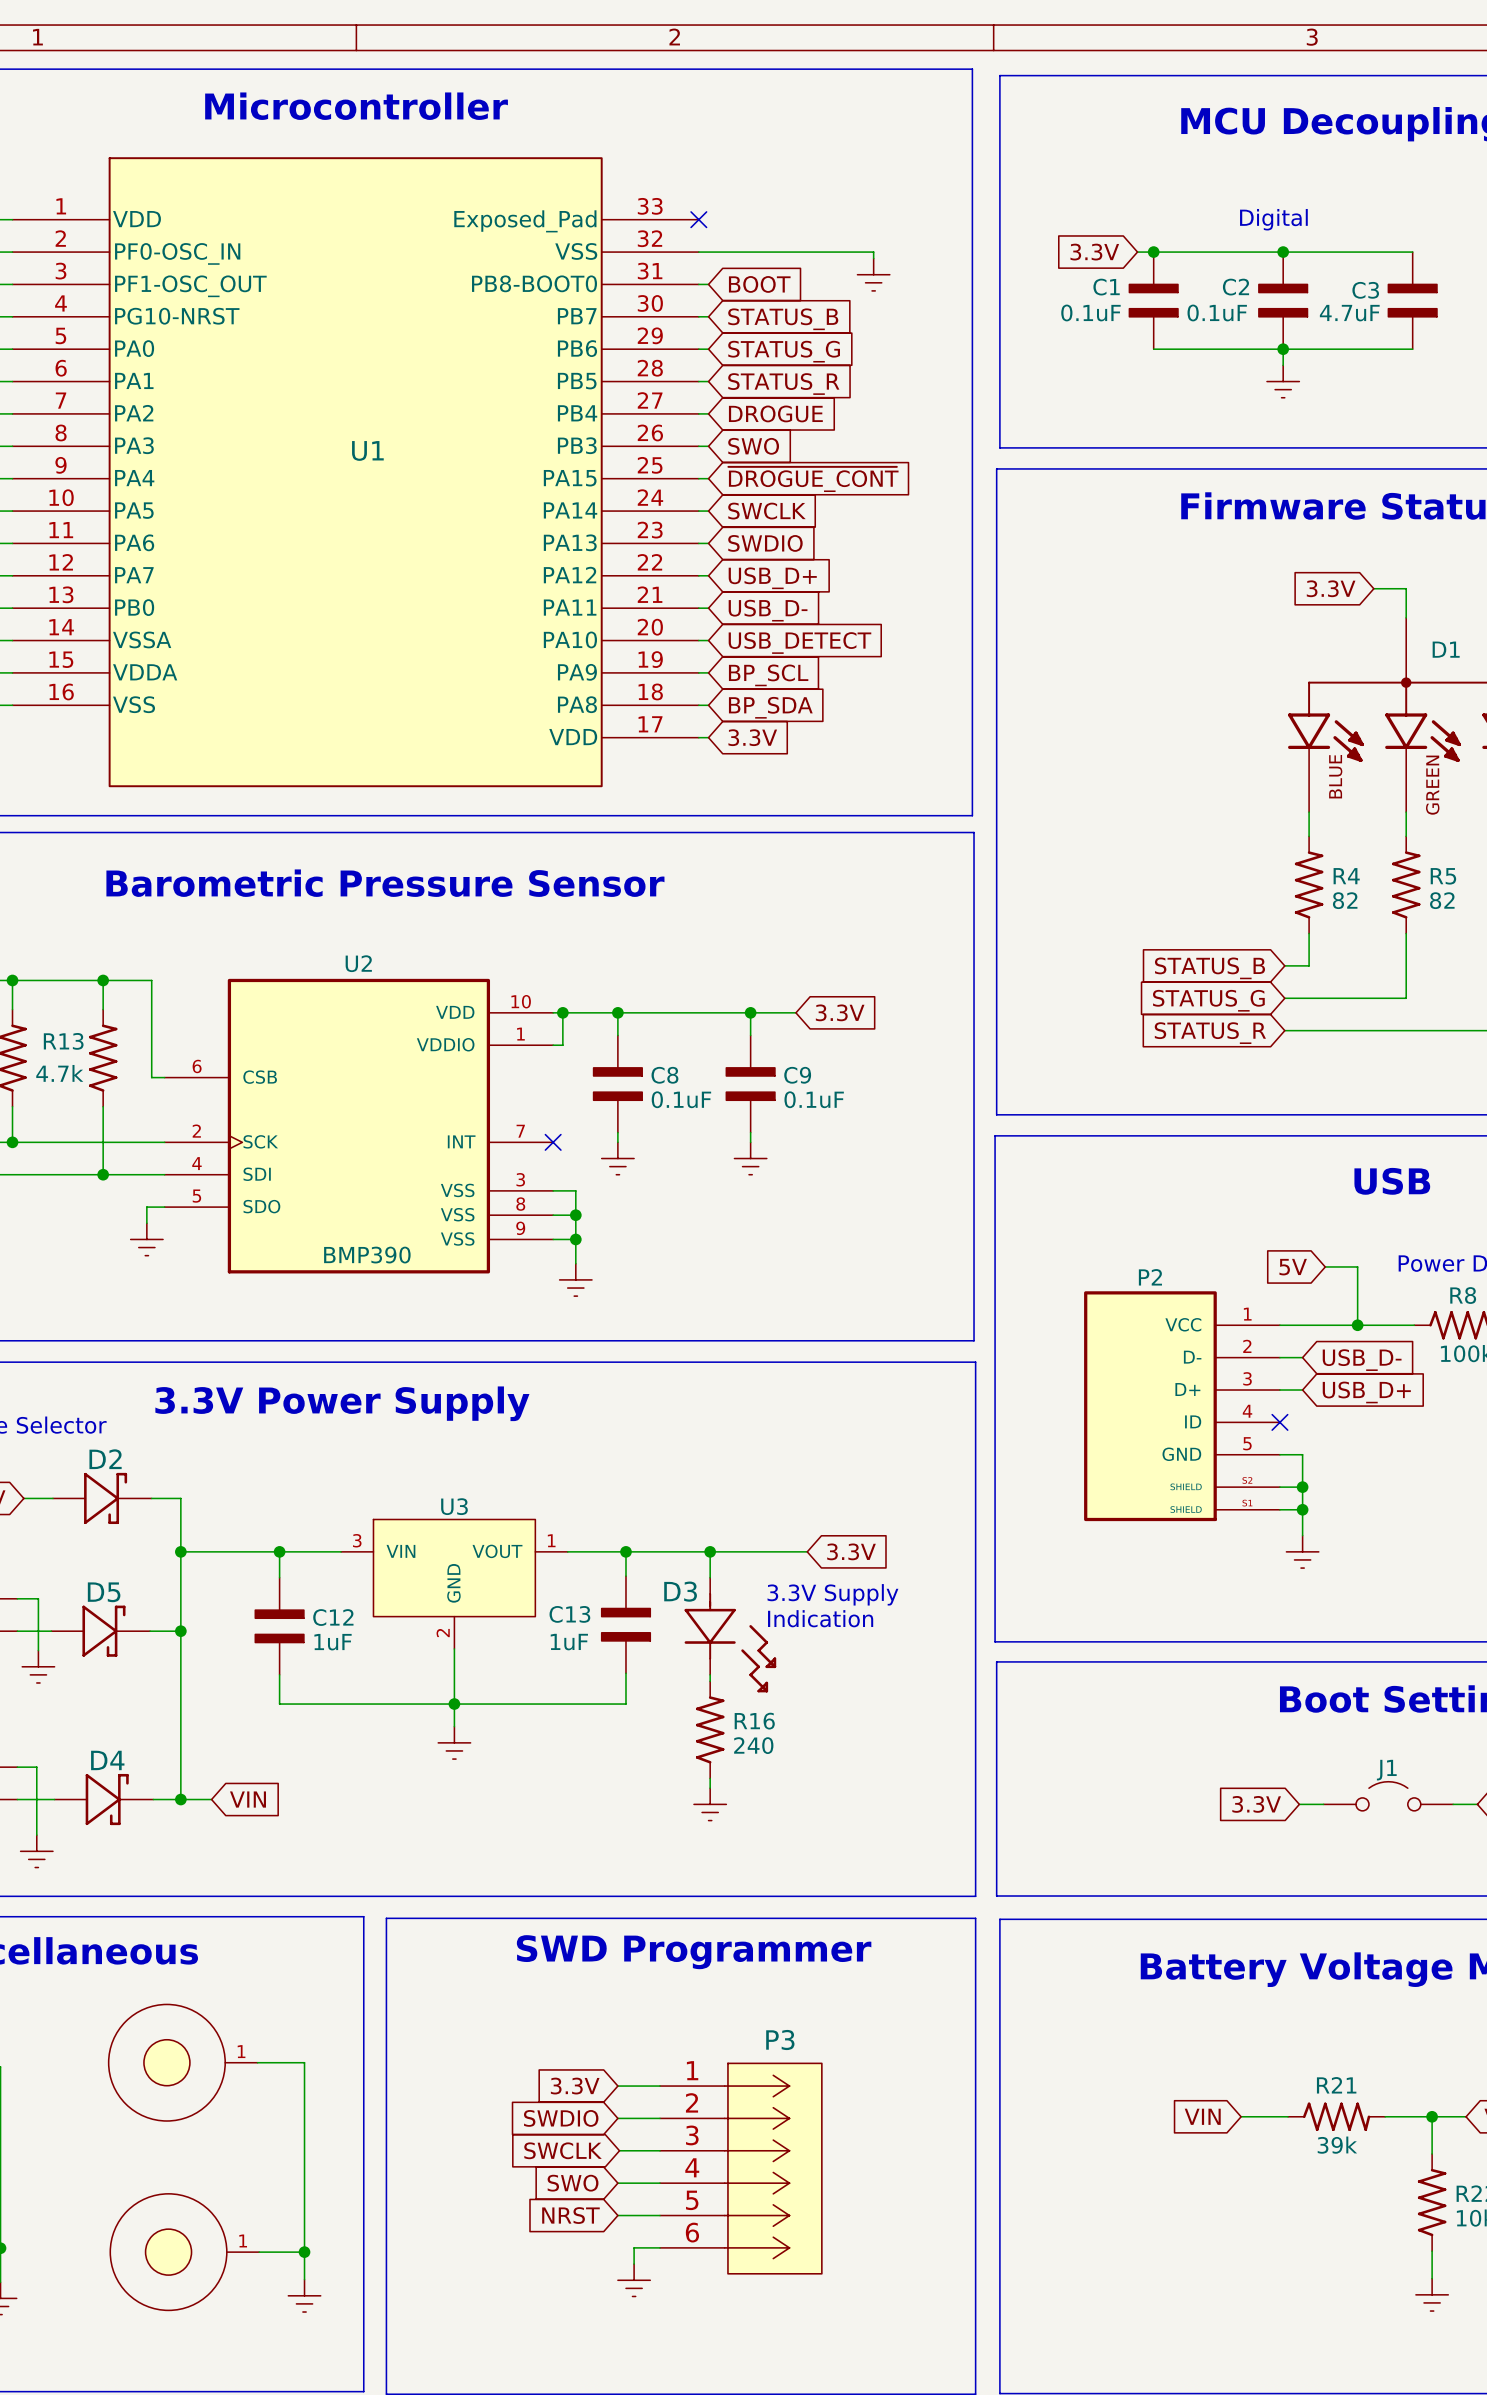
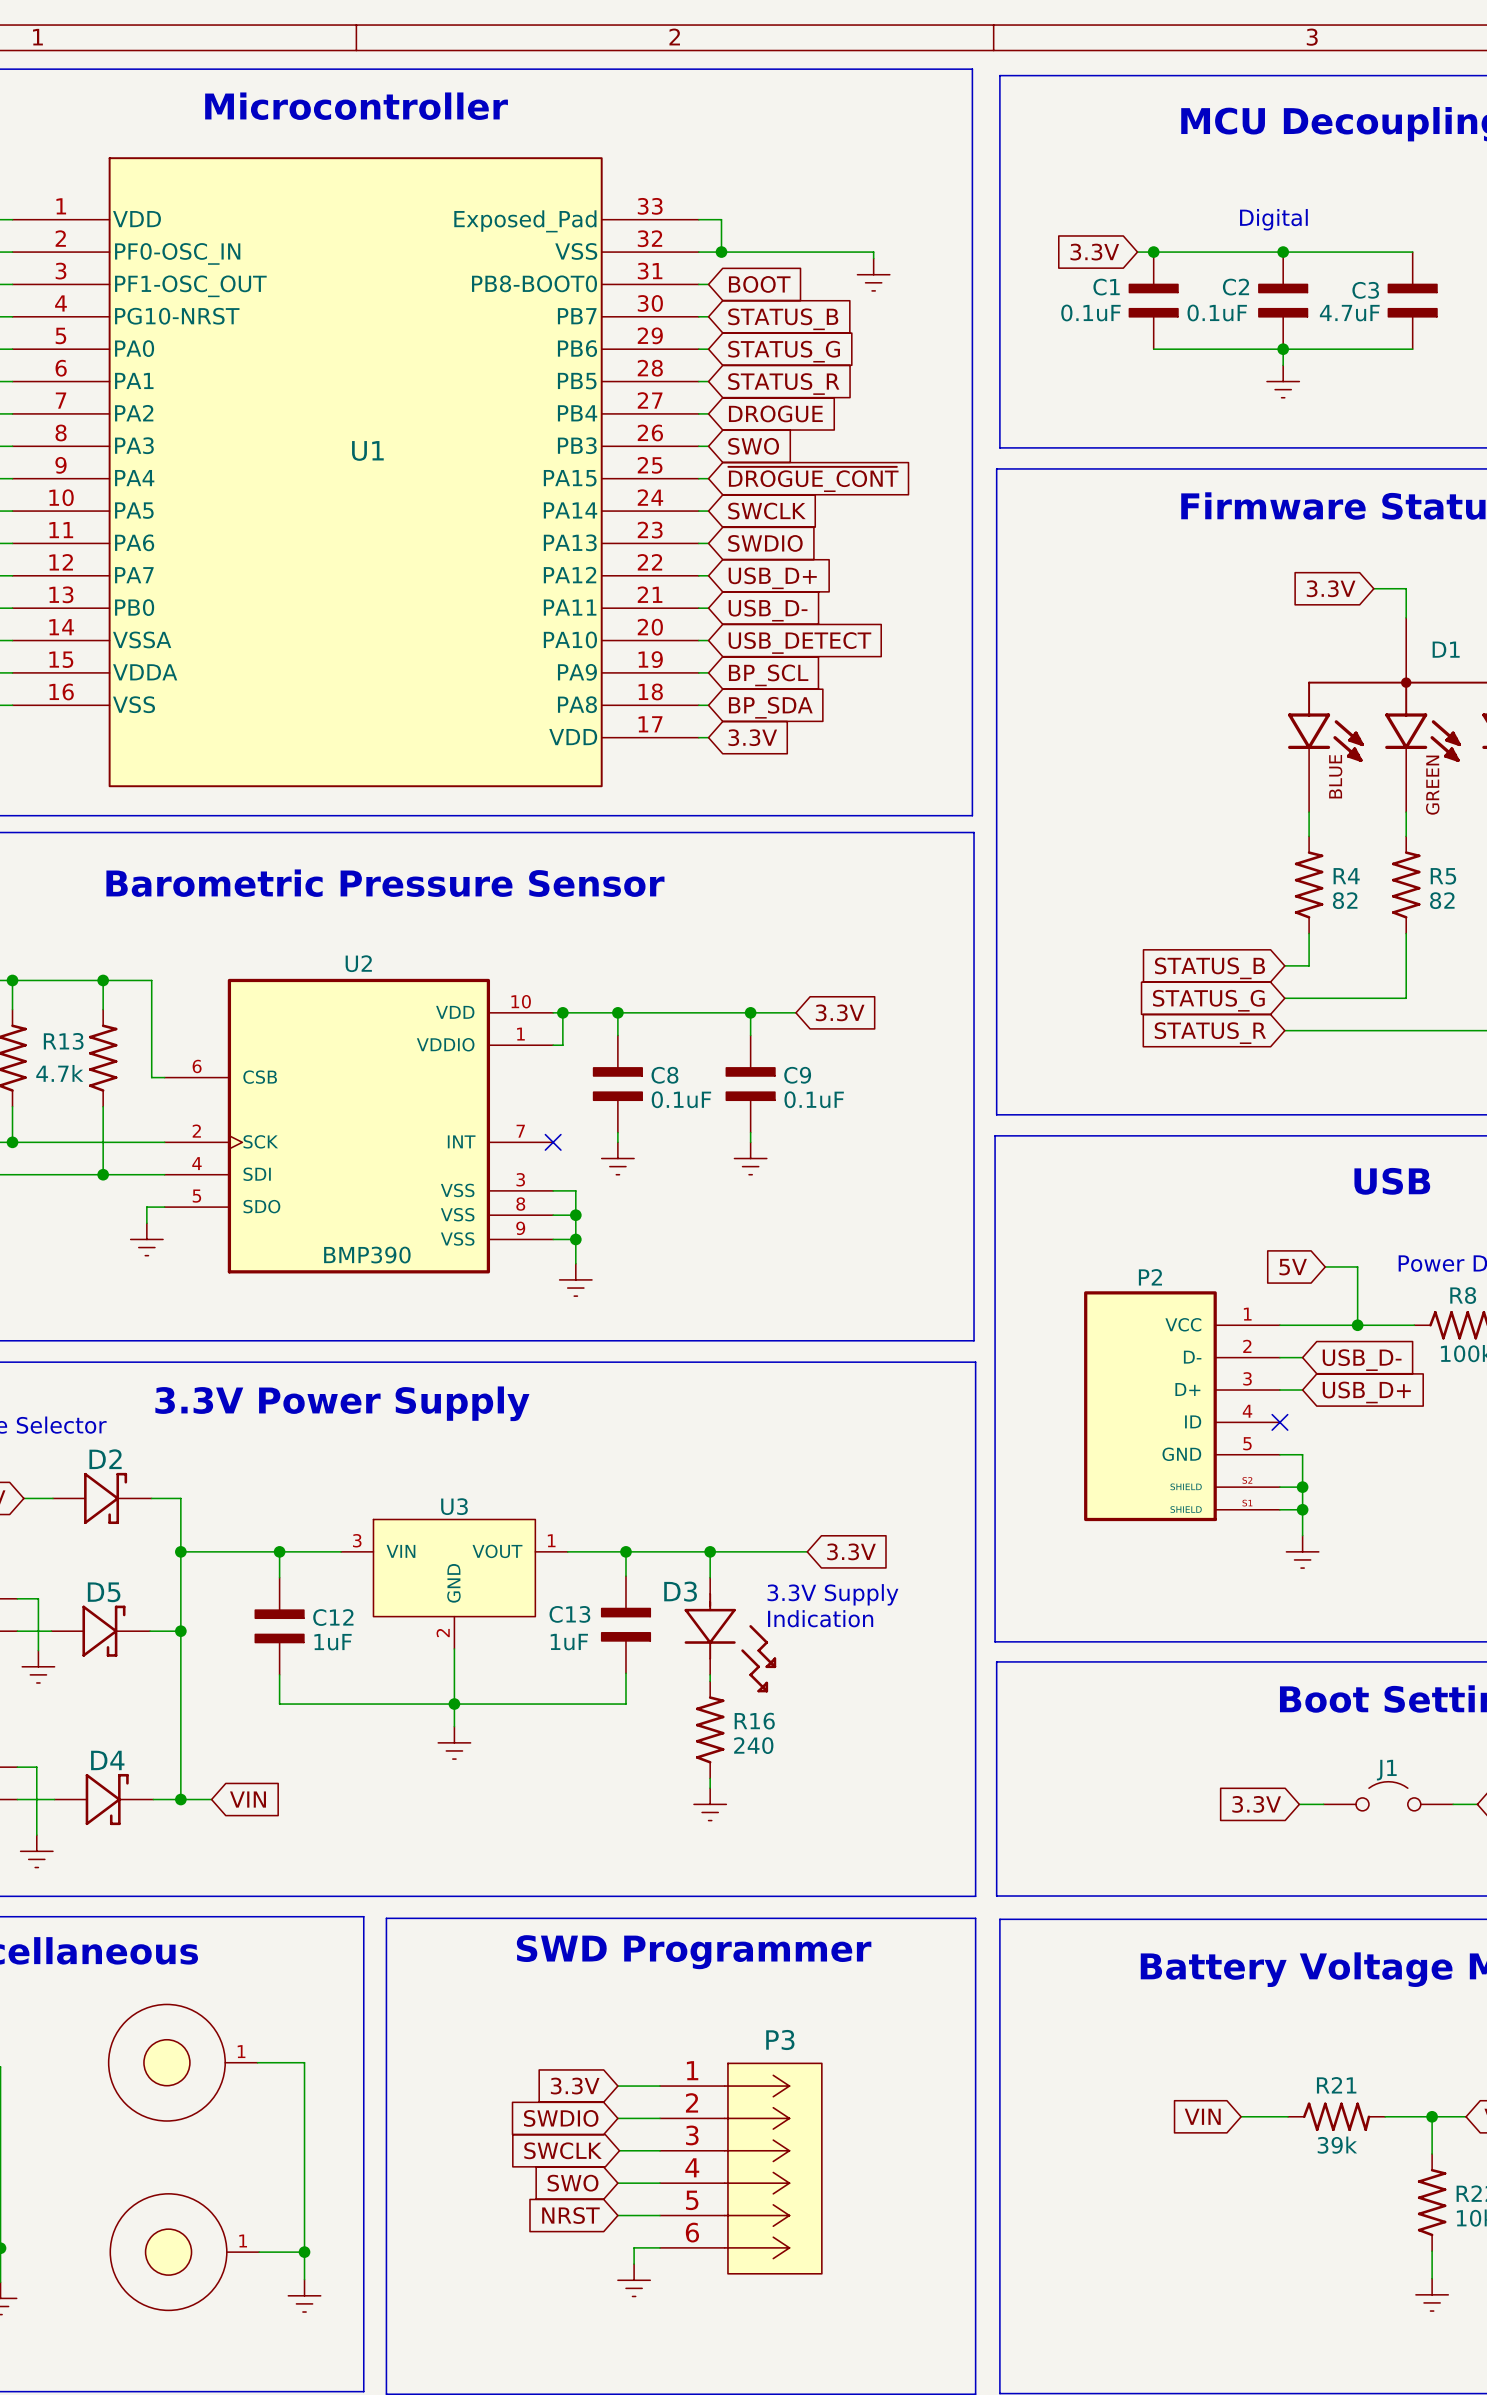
wire: none -> (698, 219) (721, 219) (721, 252)
no-connect mark: (698, 219) -> none
junction: none -> (721, 252)

